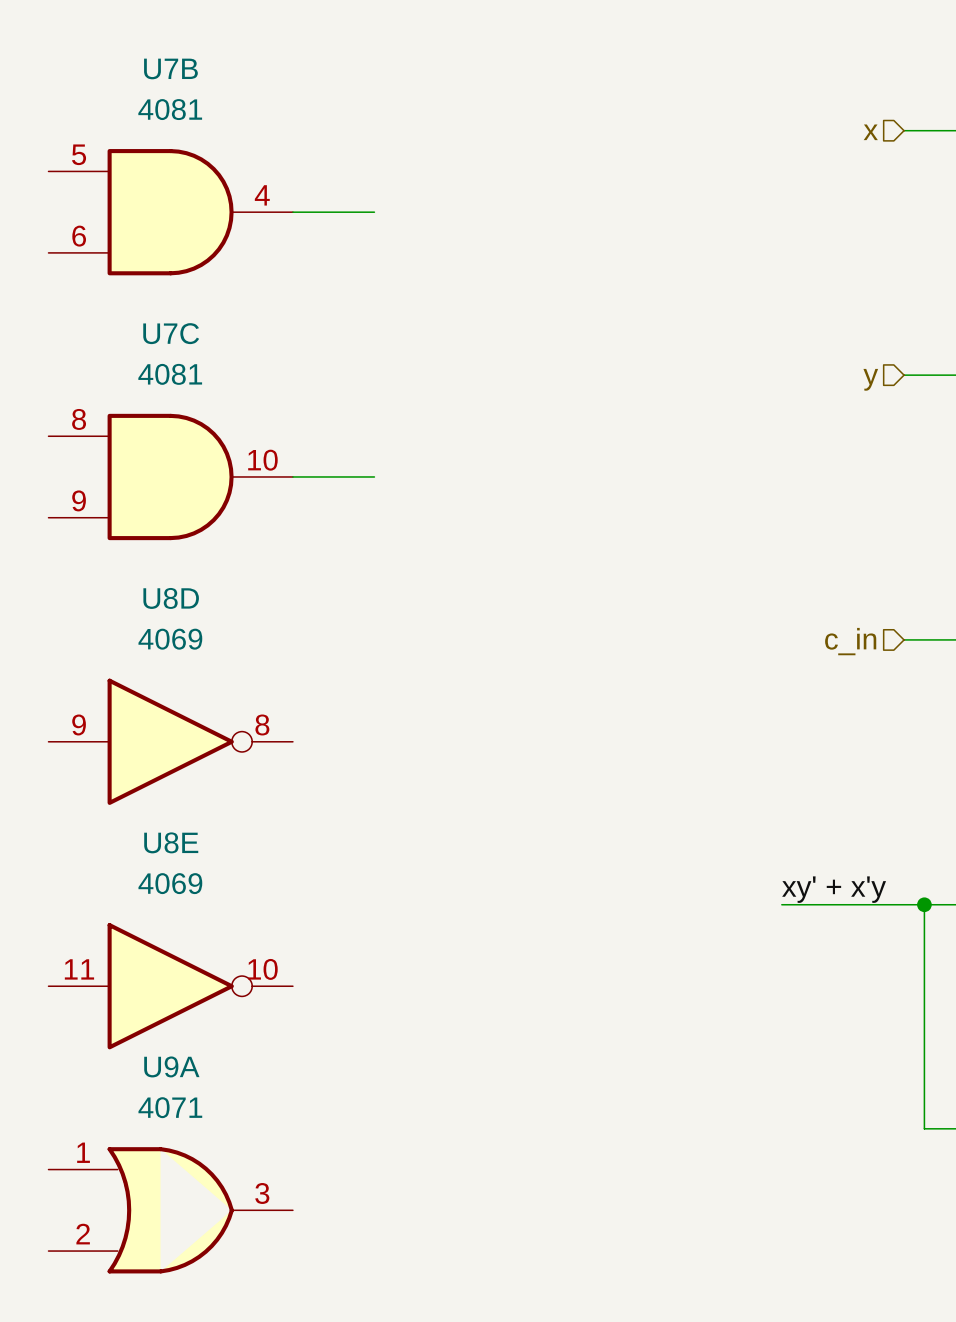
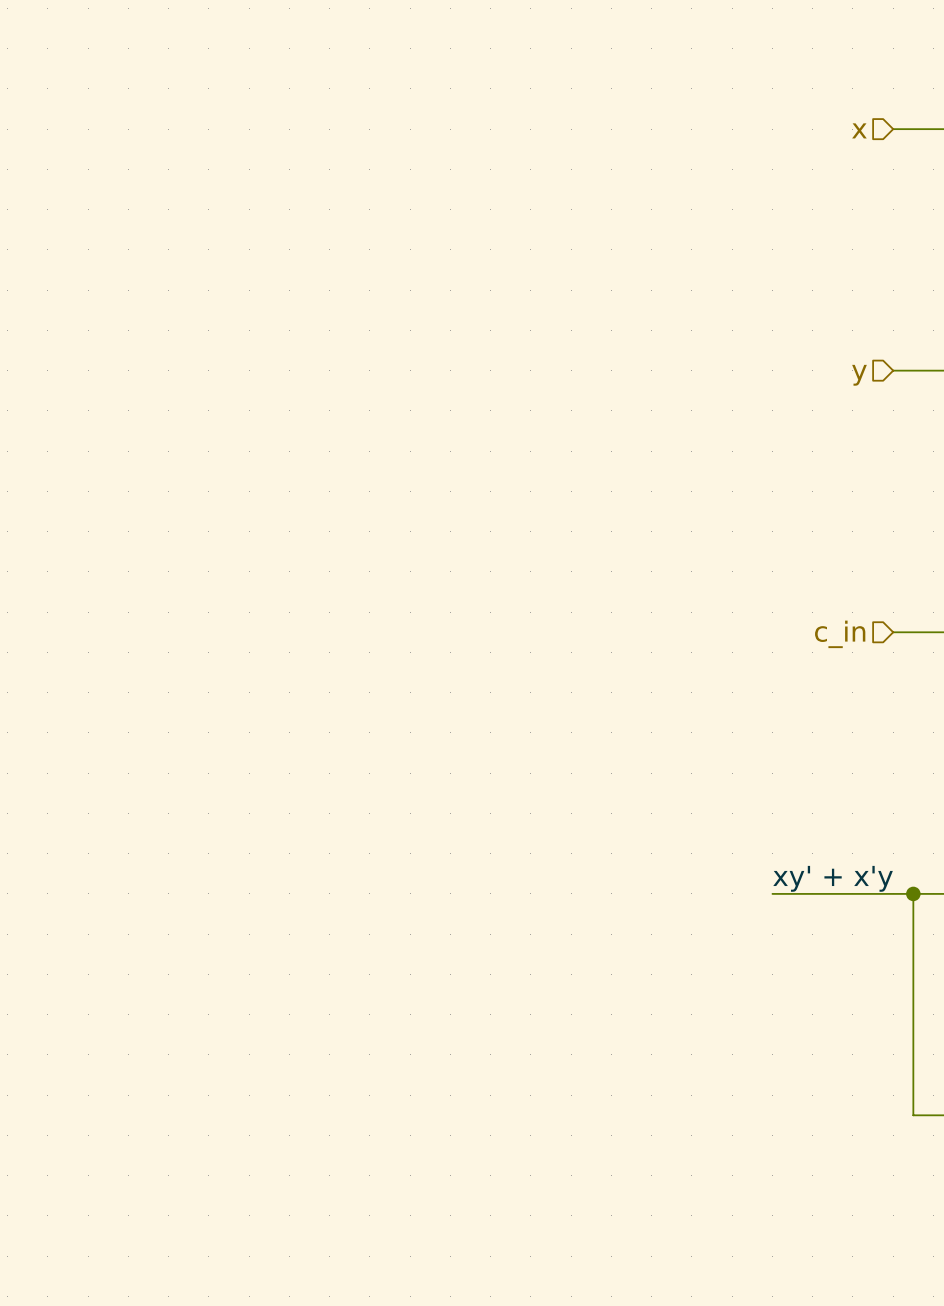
U7B: 4081 (170, 212) -> none
wire: (292, 212) (374, 212) -> none
U7C: 4081 (170, 476) -> none
wire: (292, 476) (374, 476) -> none
U8D: 4069 (170, 741) -> none
U8E: 4069 (170, 986) -> none
U9A: 4071 (170, 1210) -> none

